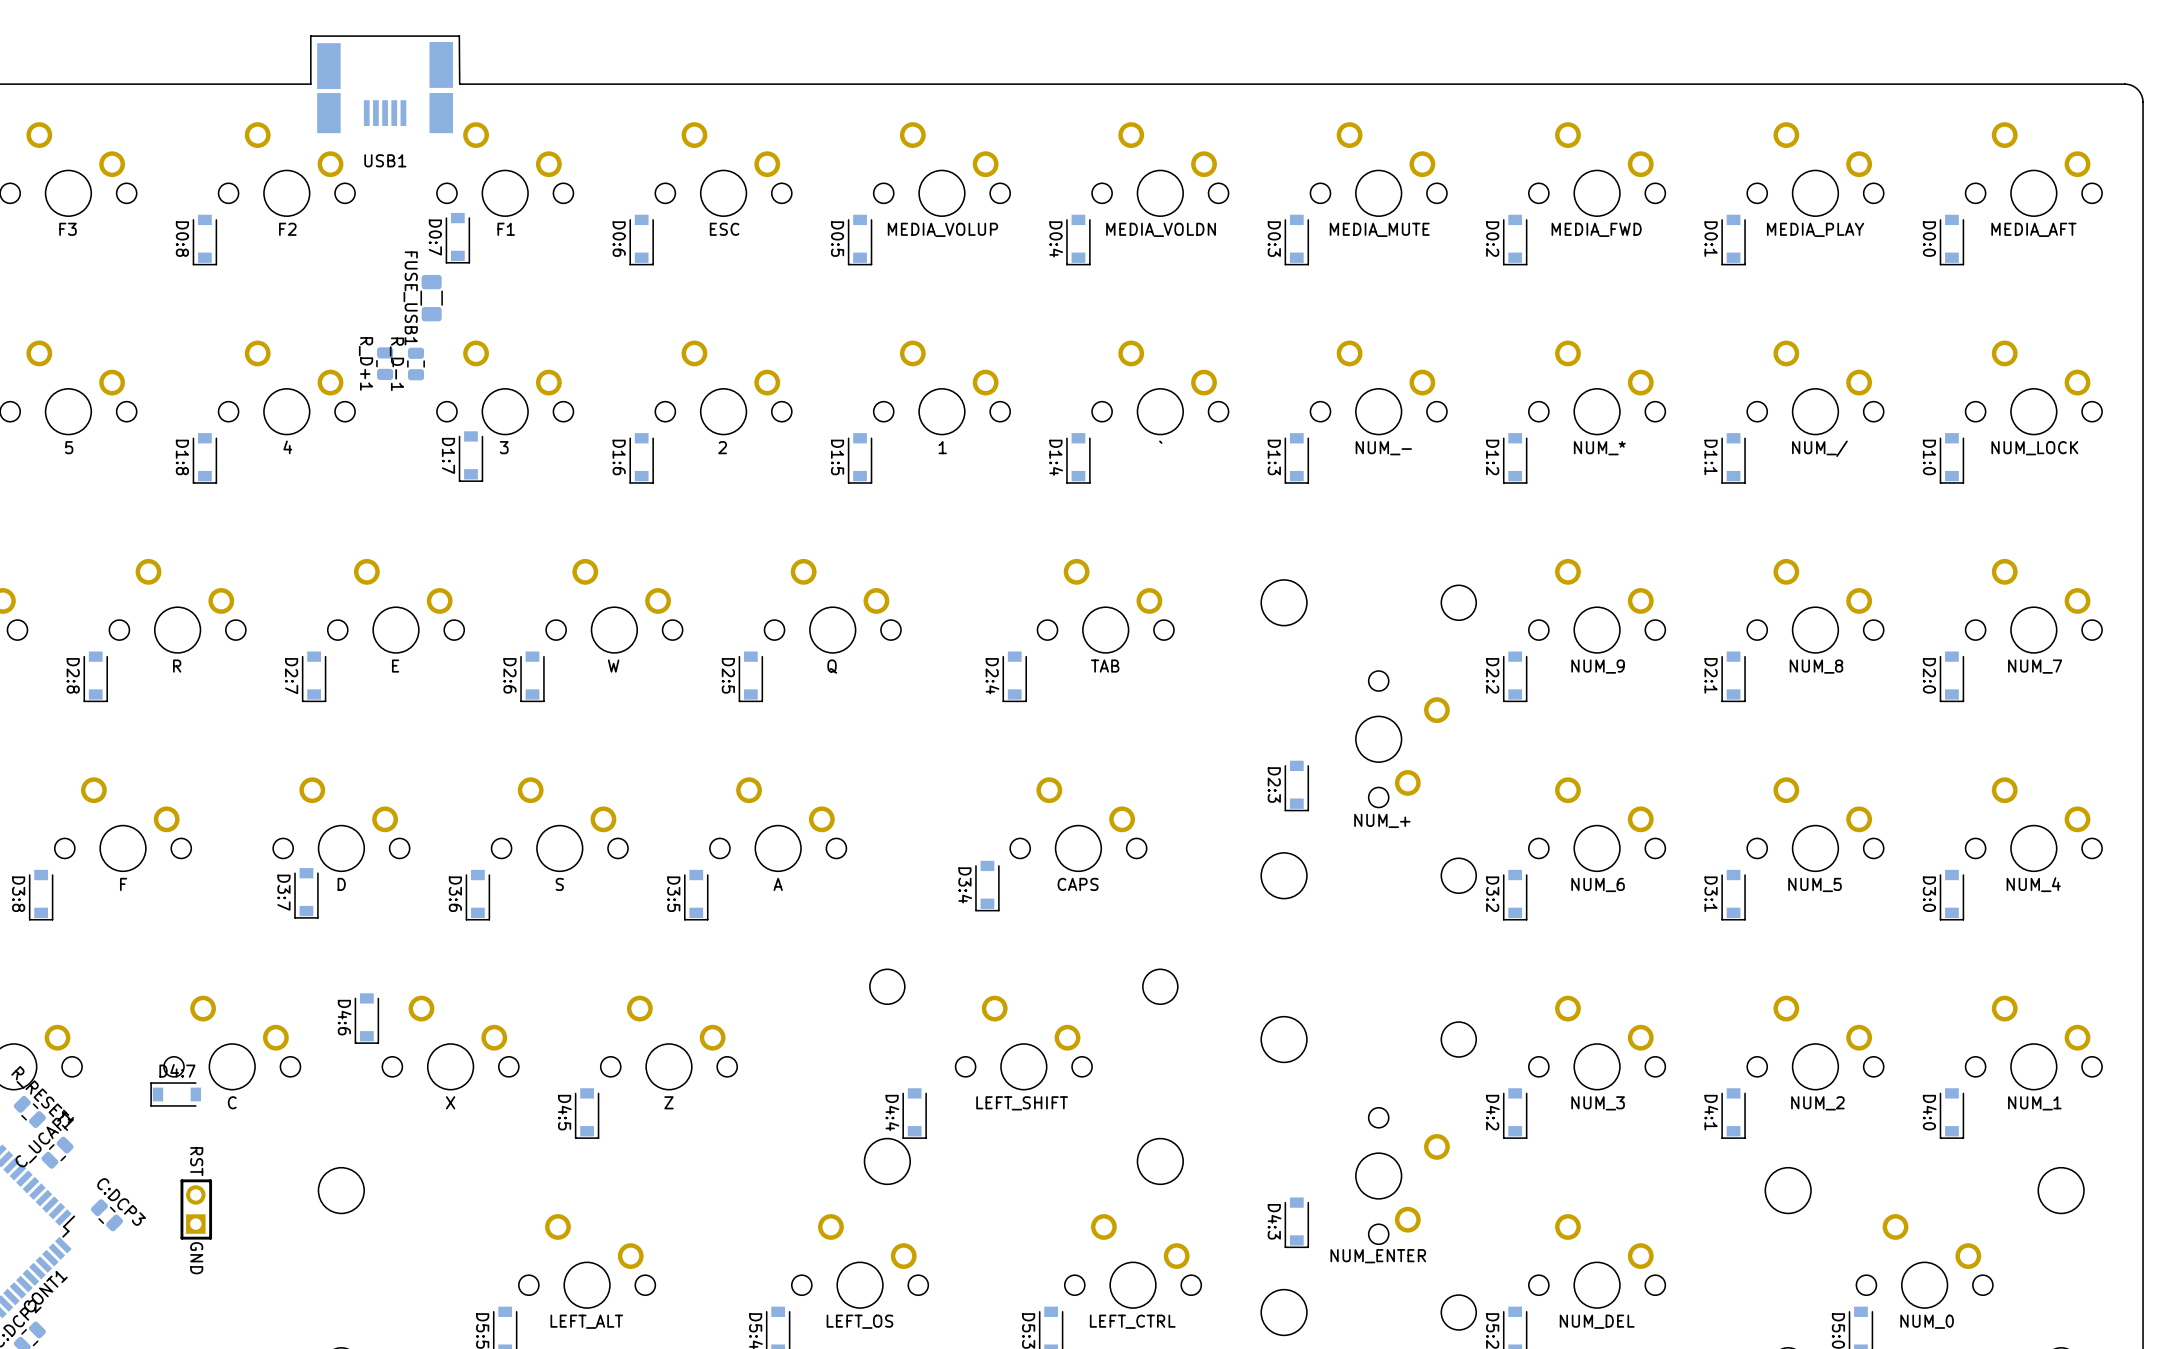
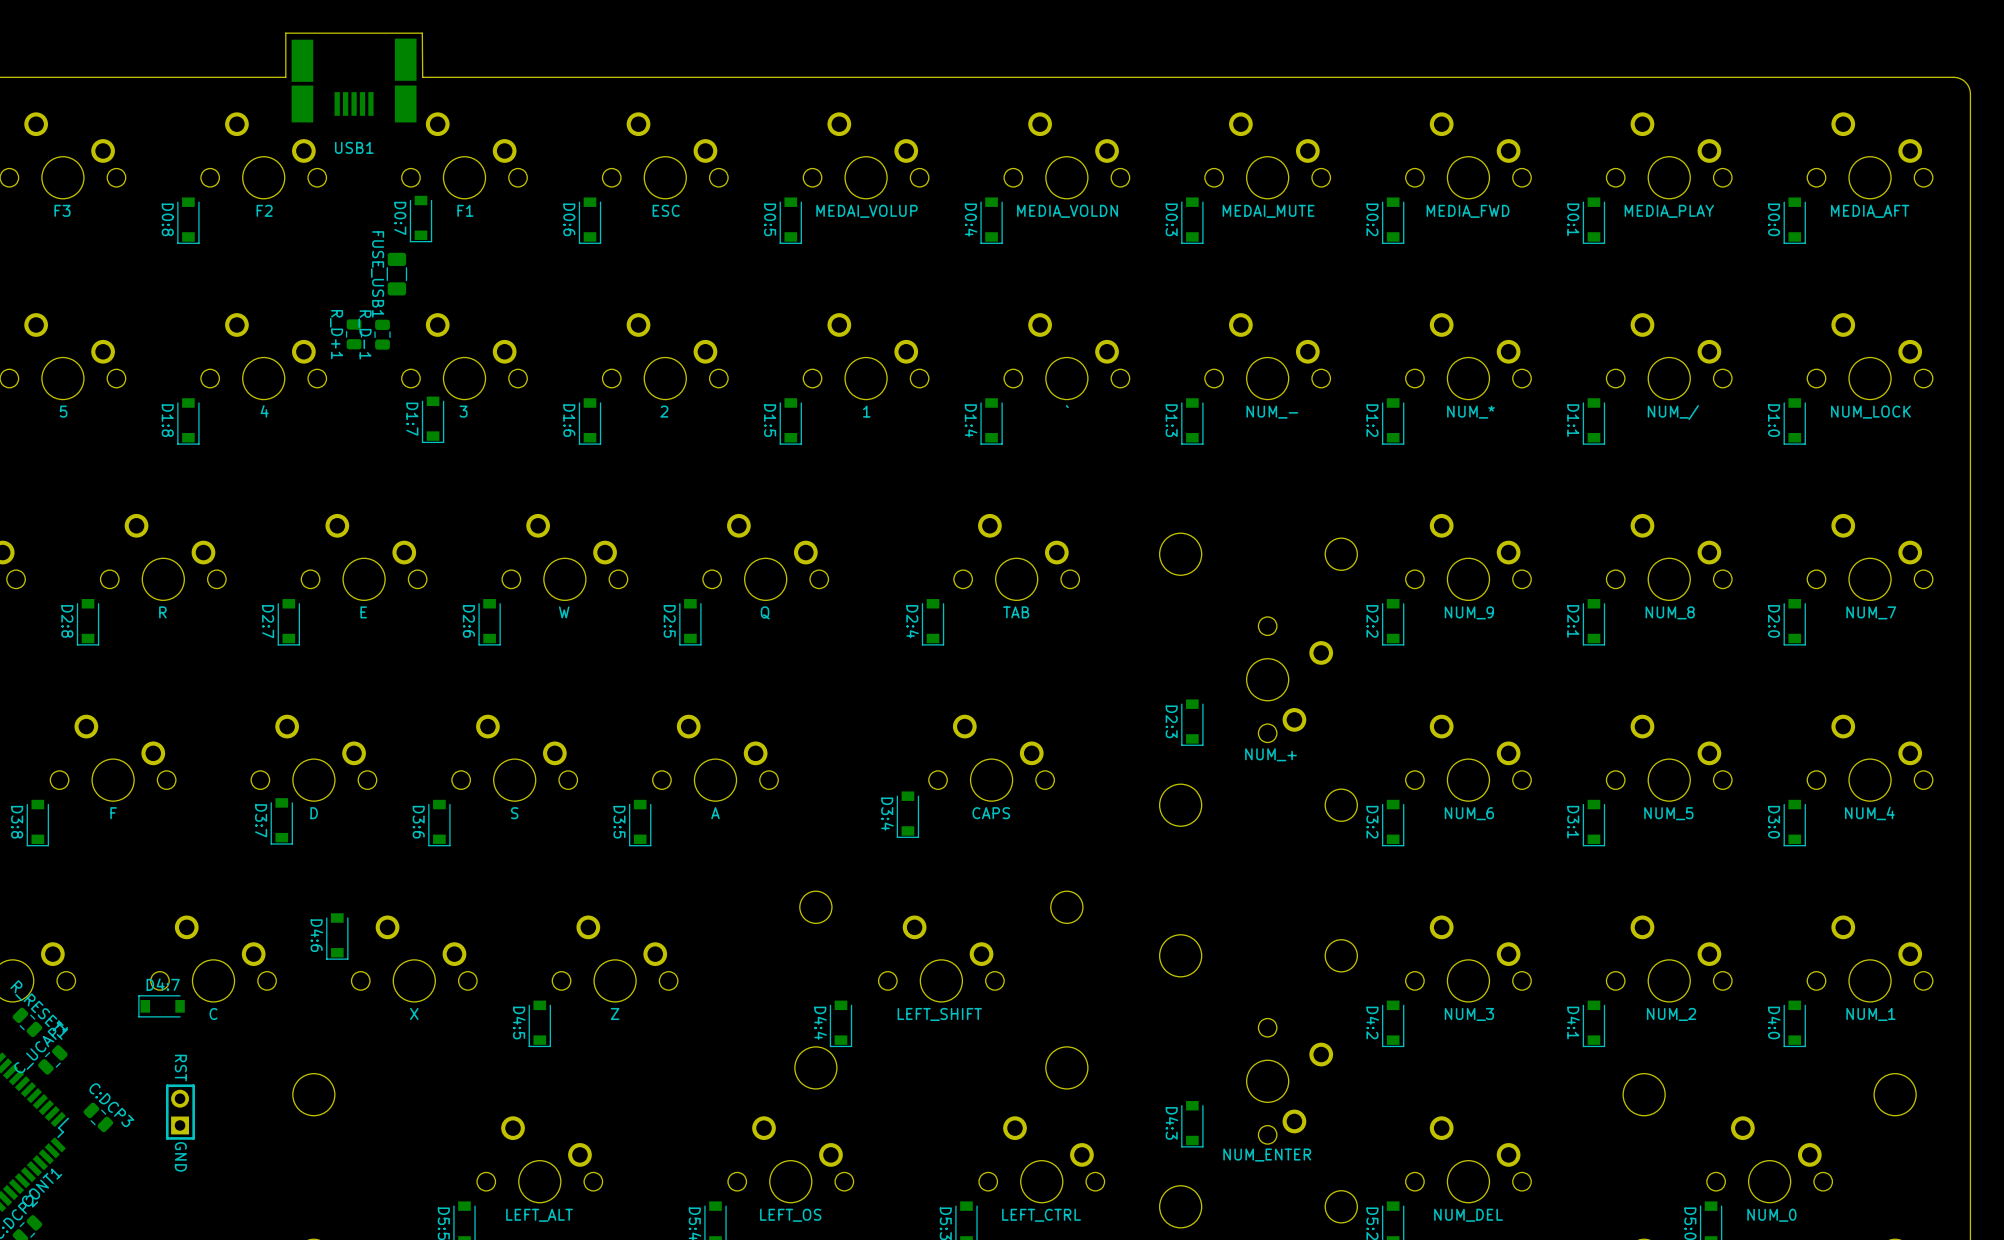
text: MEDIA_VOLUP (942, 229) -> MEDAI_VOLUP (867, 211)
text: MEDIA_MUTE (1379, 229) -> MEDAI_MUTE (1268, 211)

